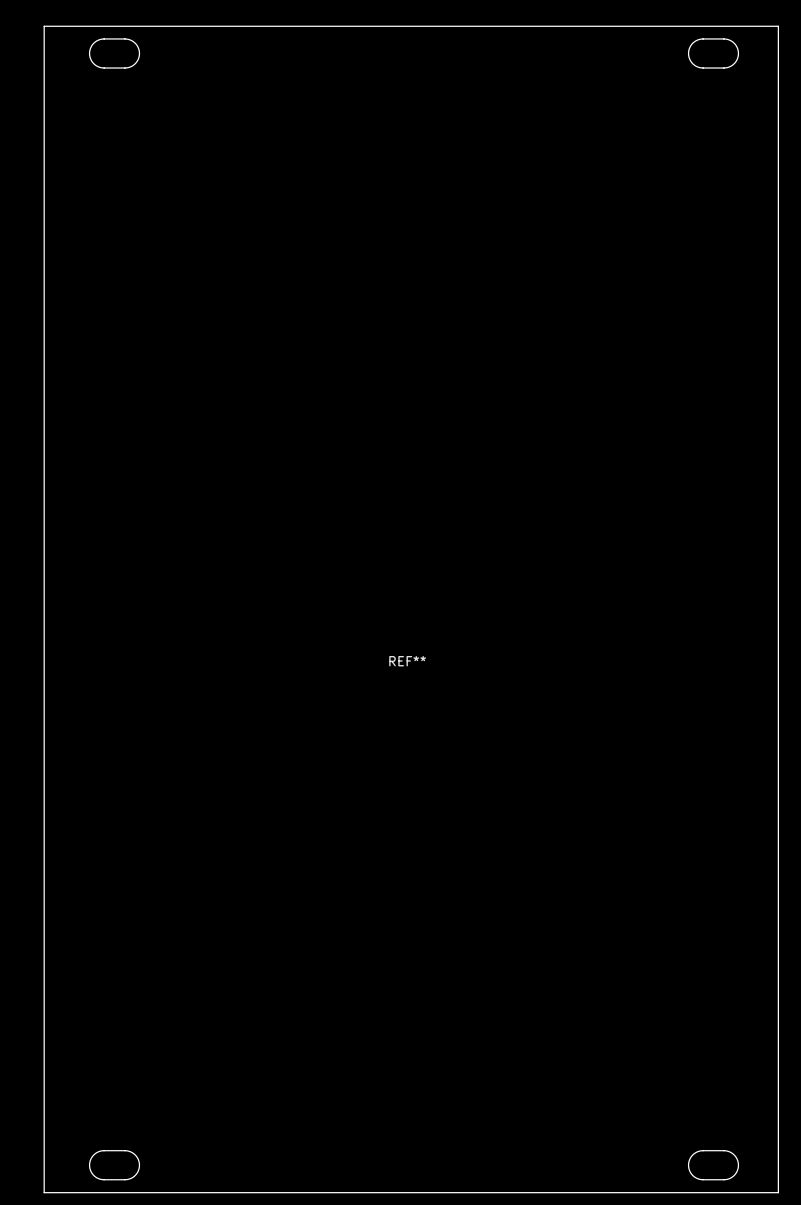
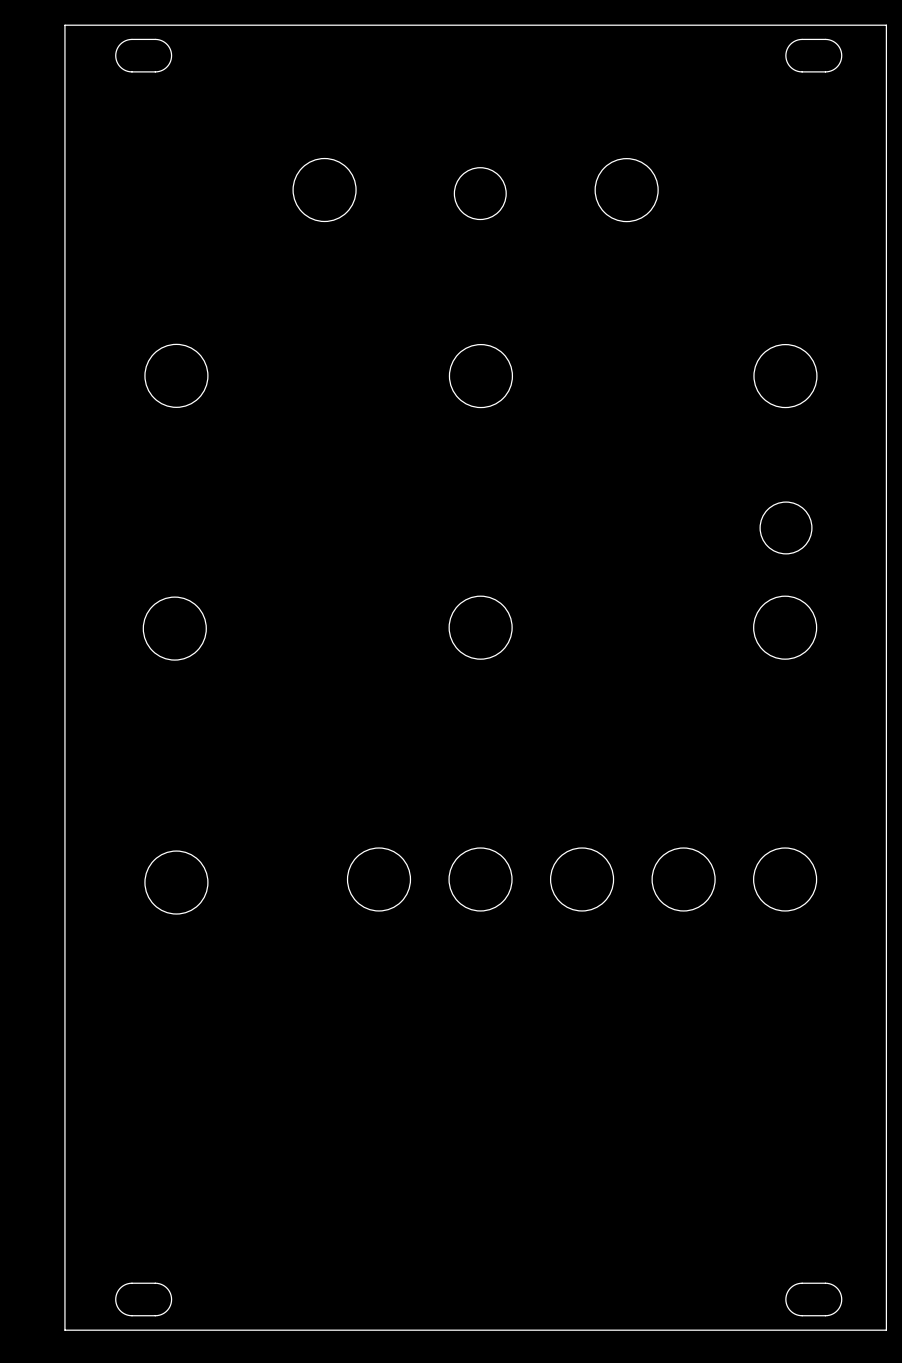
round board edge: none -> [292, 158, 357, 222]
round board edge: none -> [594, 158, 659, 223]
round board edge: none -> [453, 167, 507, 221]
round board edge: none -> [144, 343, 209, 408]
round board edge: none -> [448, 344, 513, 409]
round board edge: none -> [753, 344, 818, 409]
round board edge: none -> [759, 501, 813, 555]
round board edge: none -> [142, 596, 207, 661]
round board edge: none -> [448, 595, 513, 660]
round board edge: none -> [753, 595, 818, 660]
REF**: (407, 661) -> none
round board edge: none -> [347, 847, 411, 912]
round board edge: none -> [448, 847, 513, 912]
round board edge: none -> [550, 847, 615, 912]
round board edge: none -> [651, 847, 716, 912]
round board edge: none -> [753, 847, 818, 912]
round board edge: none -> [144, 850, 209, 915]

